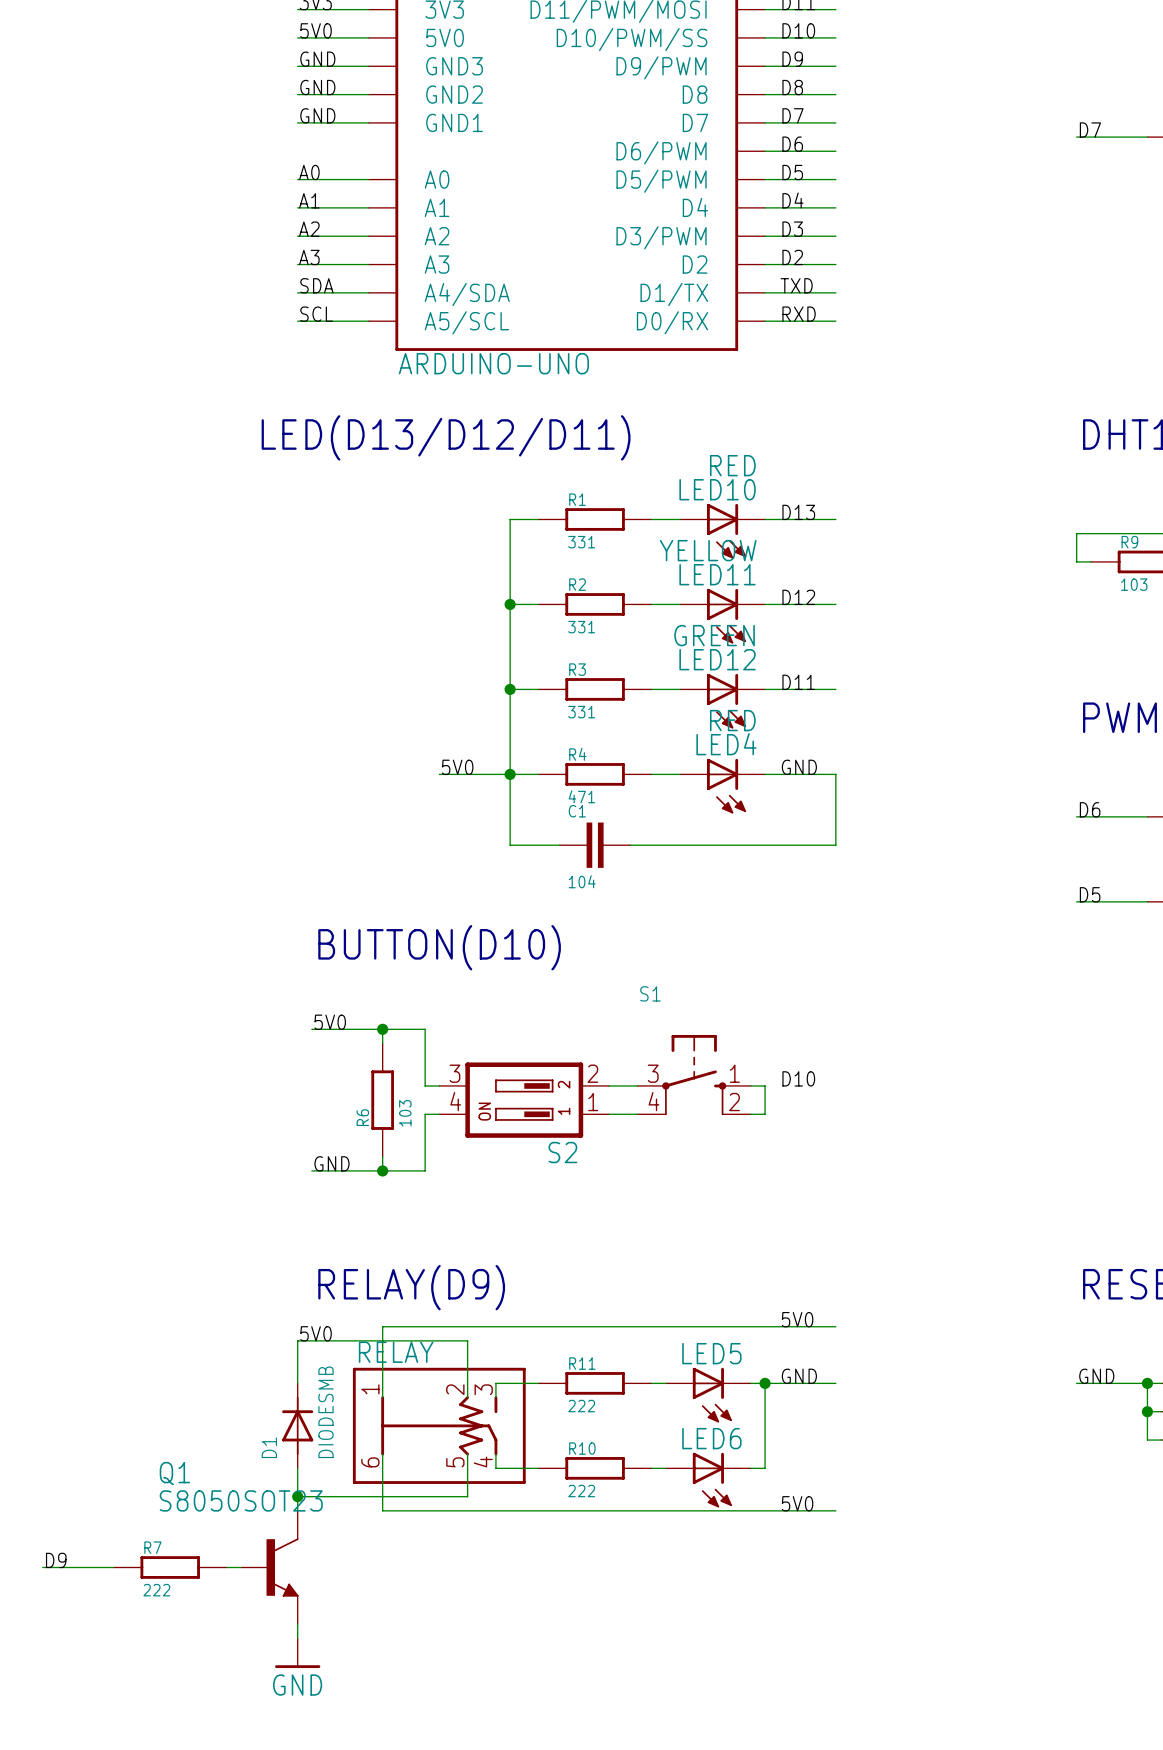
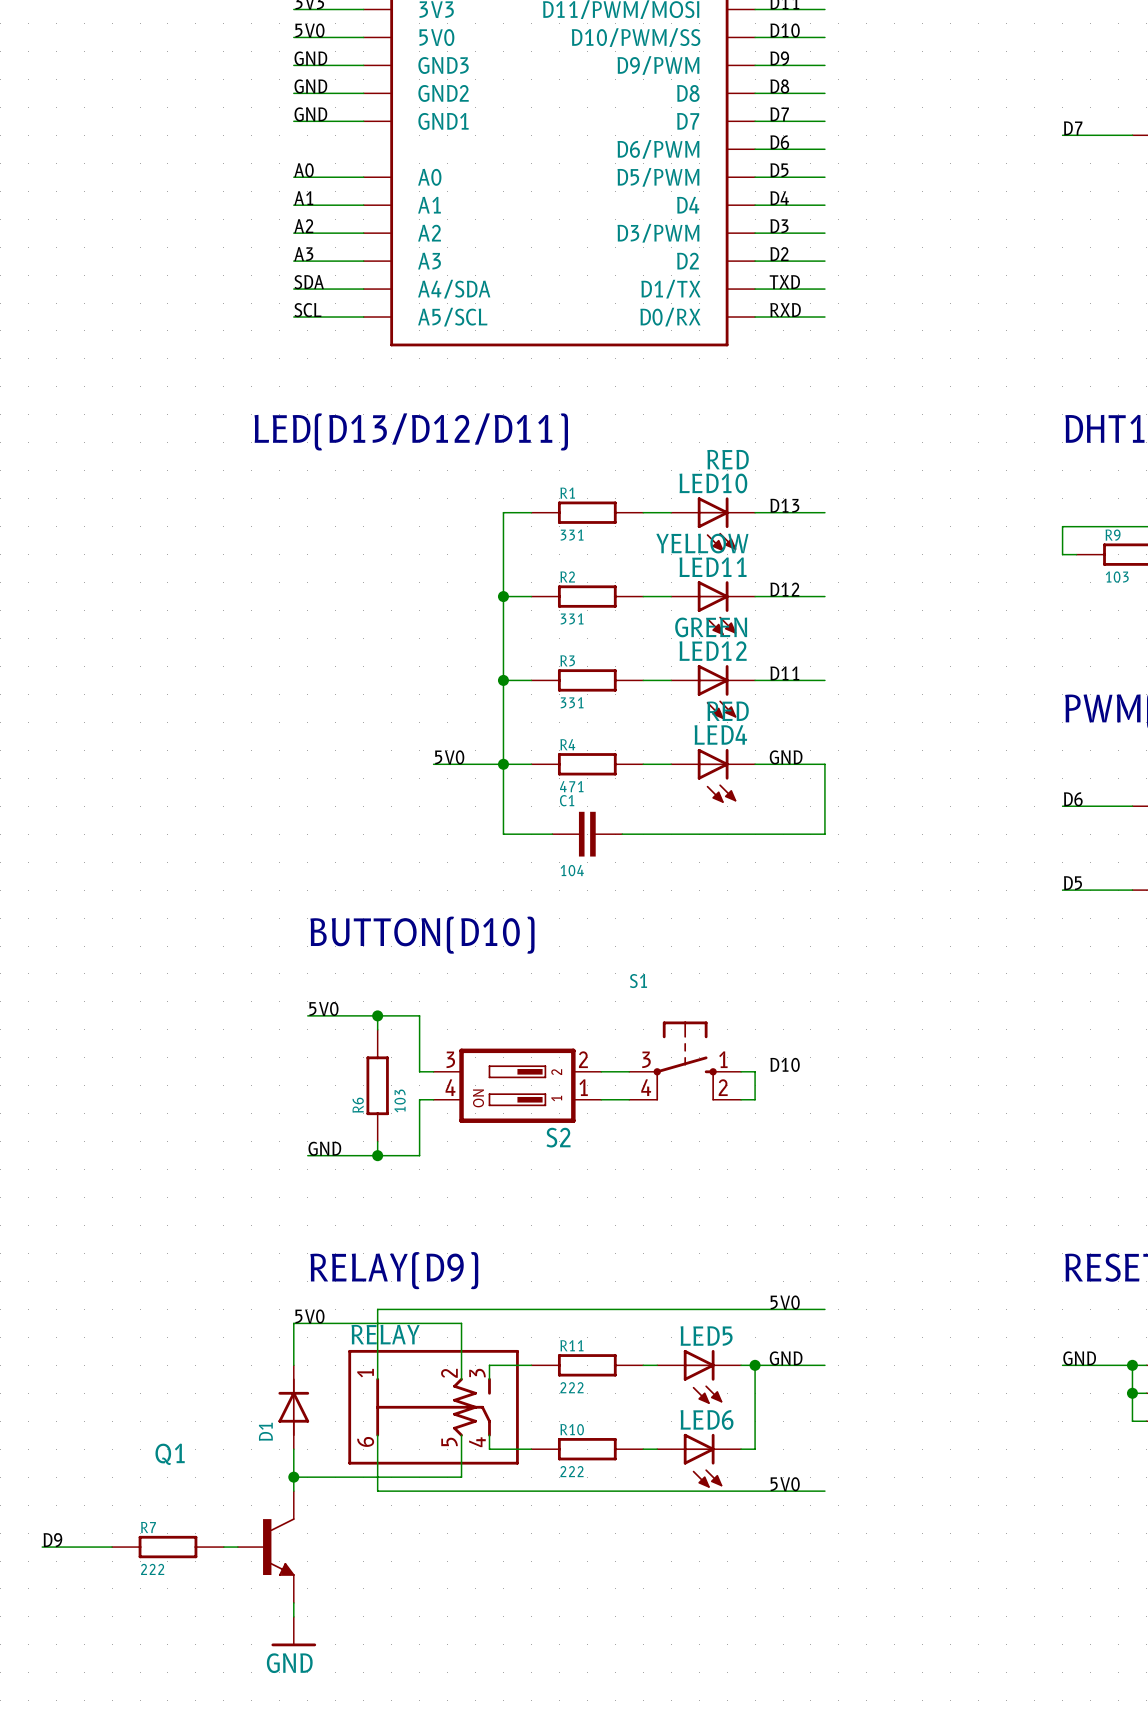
part value: ARDUINO-UNO (493, 363) -> none
D1 value: DIODESMB (326, 1412) -> none
Q1 value: S8050SOT23 (241, 1500) -> none

